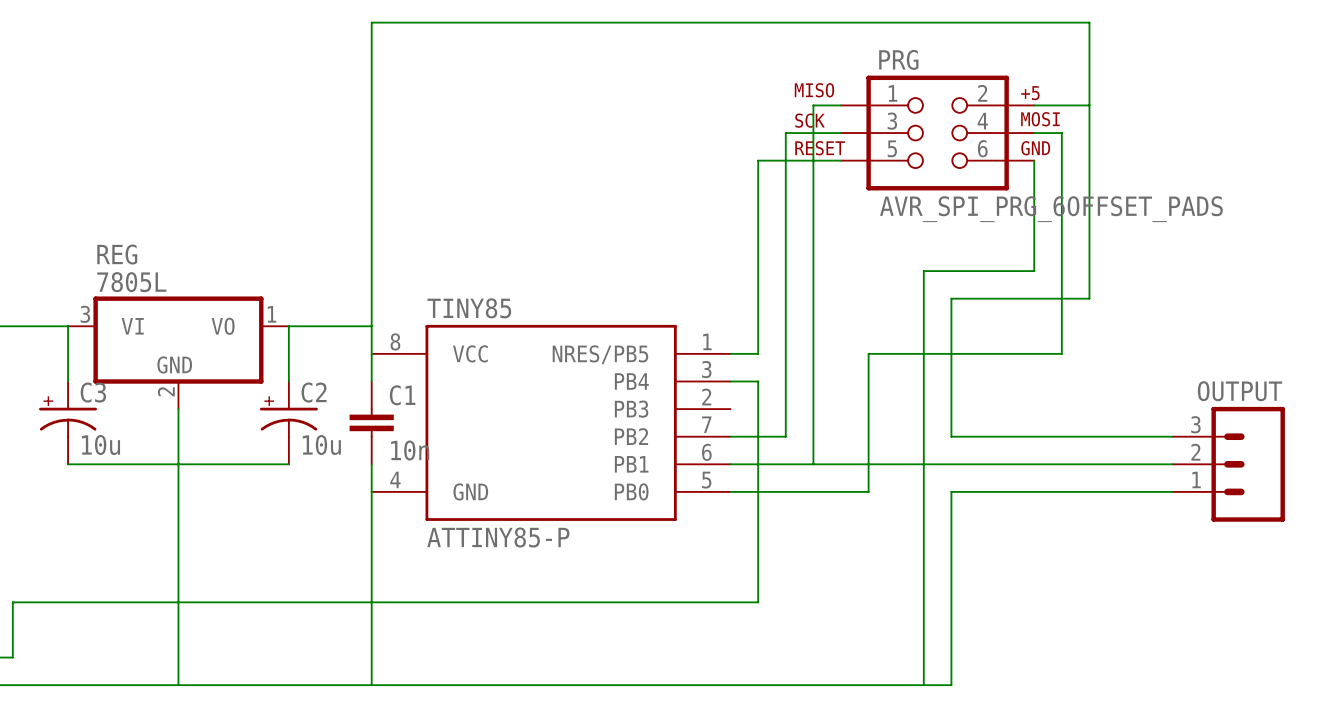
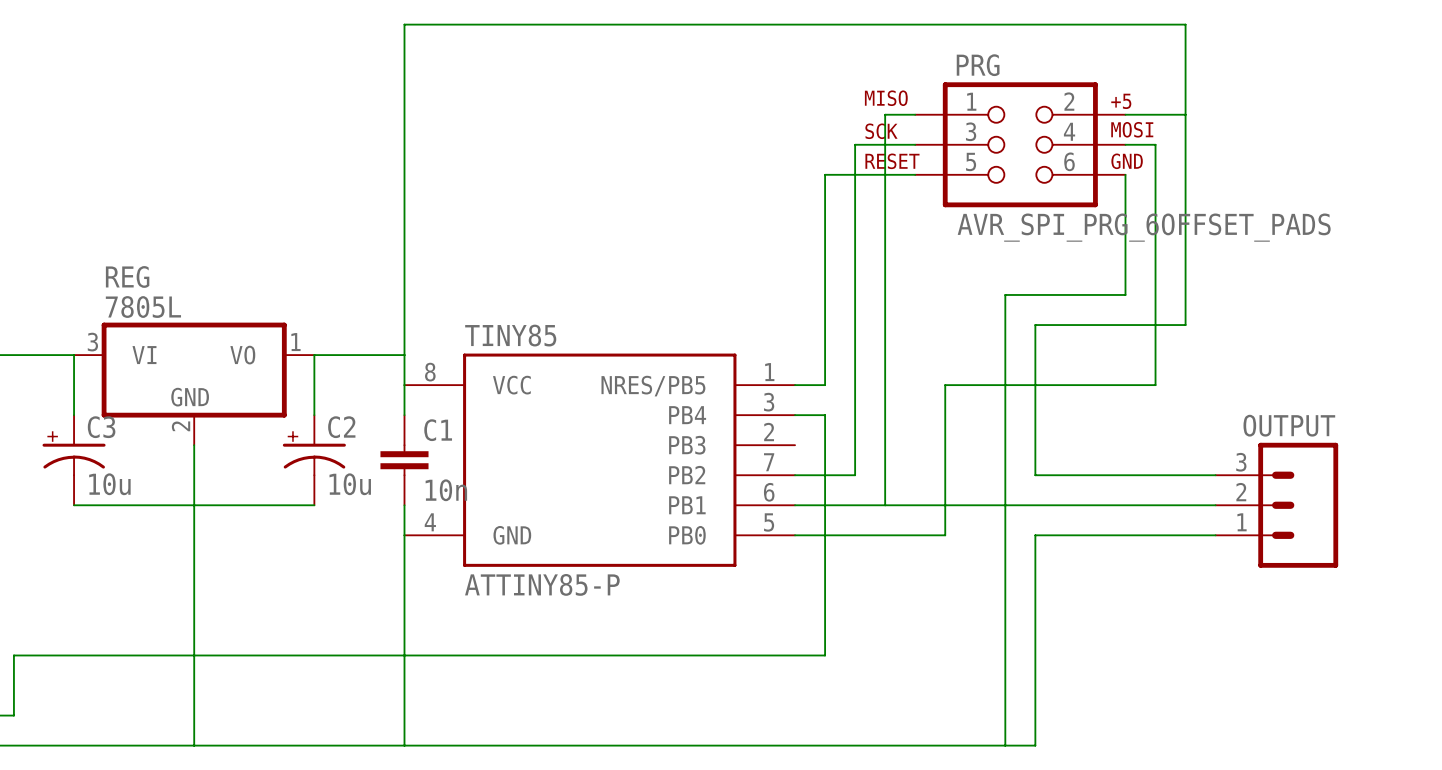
OUTPUT position: (1228, 464) -> (1276, 505)

